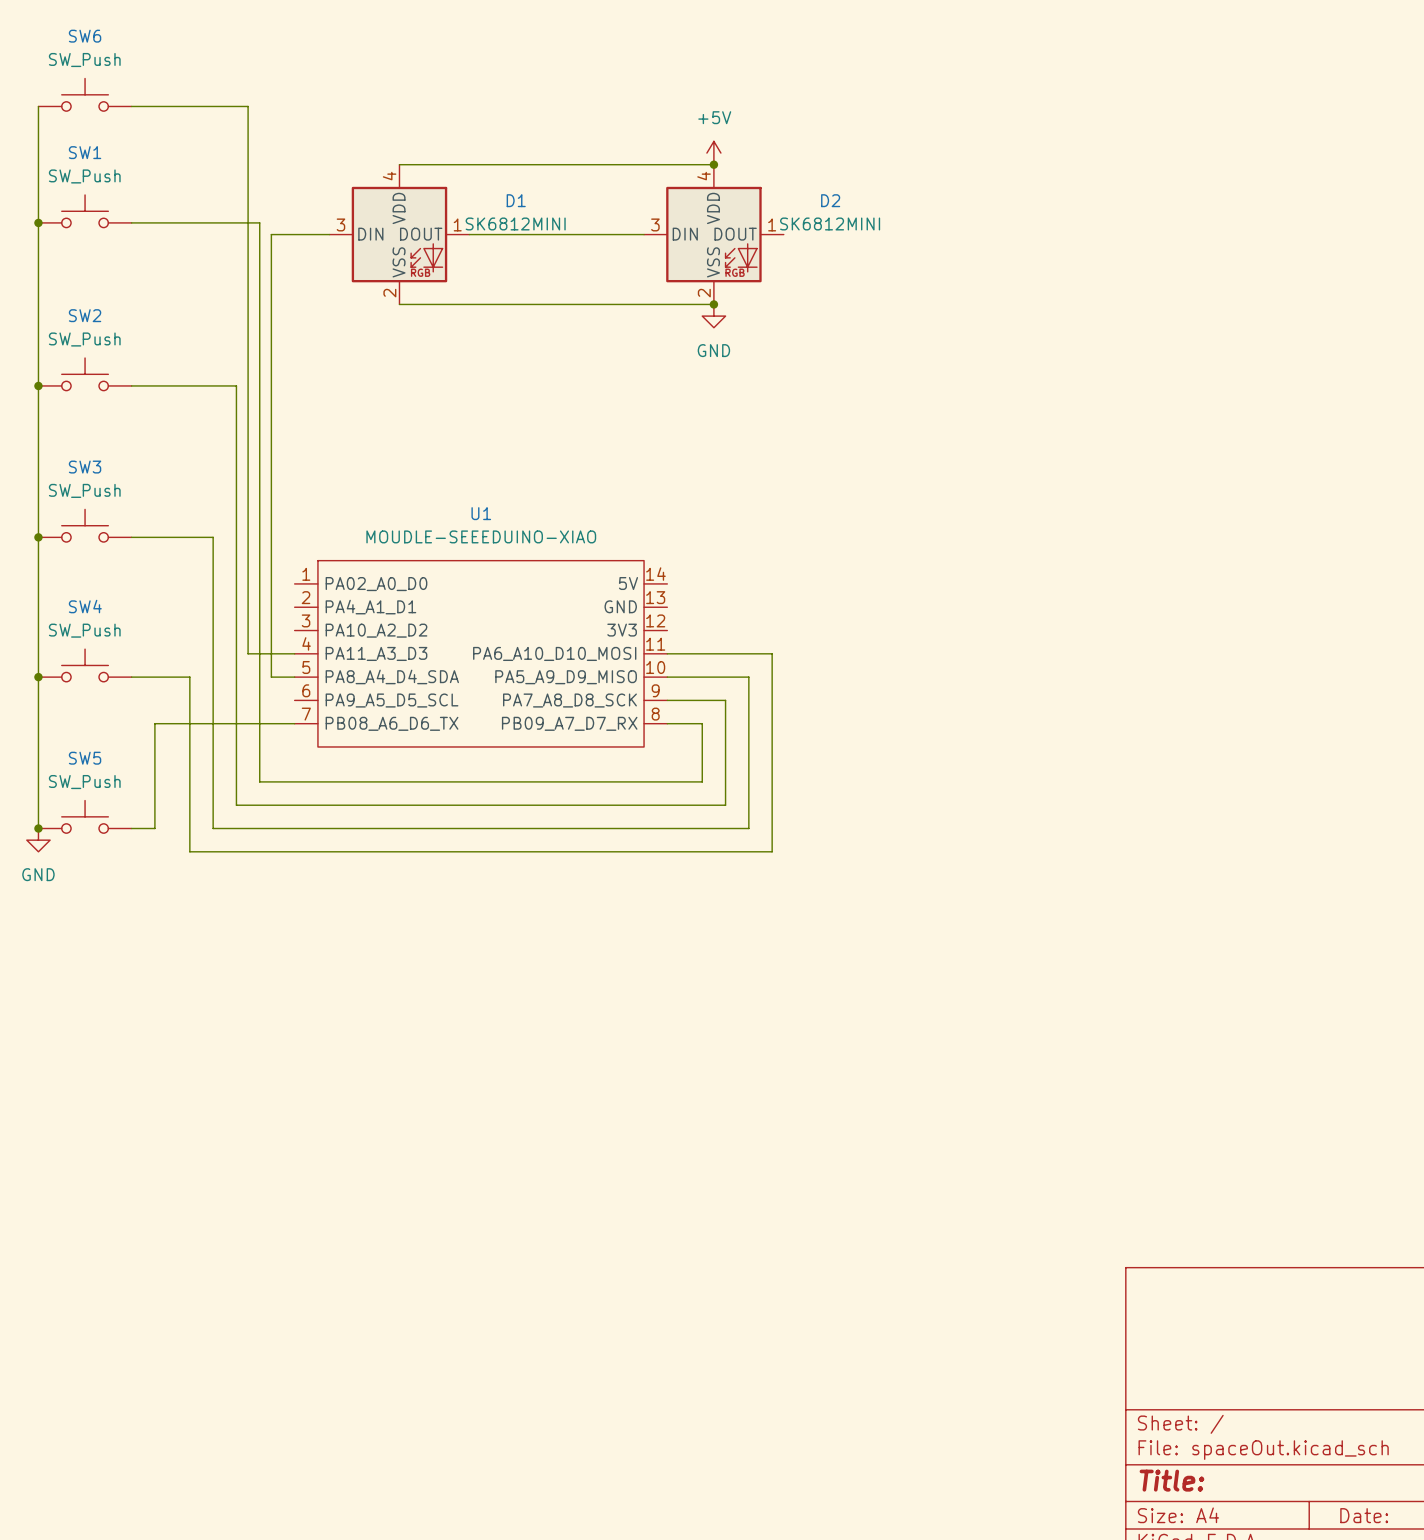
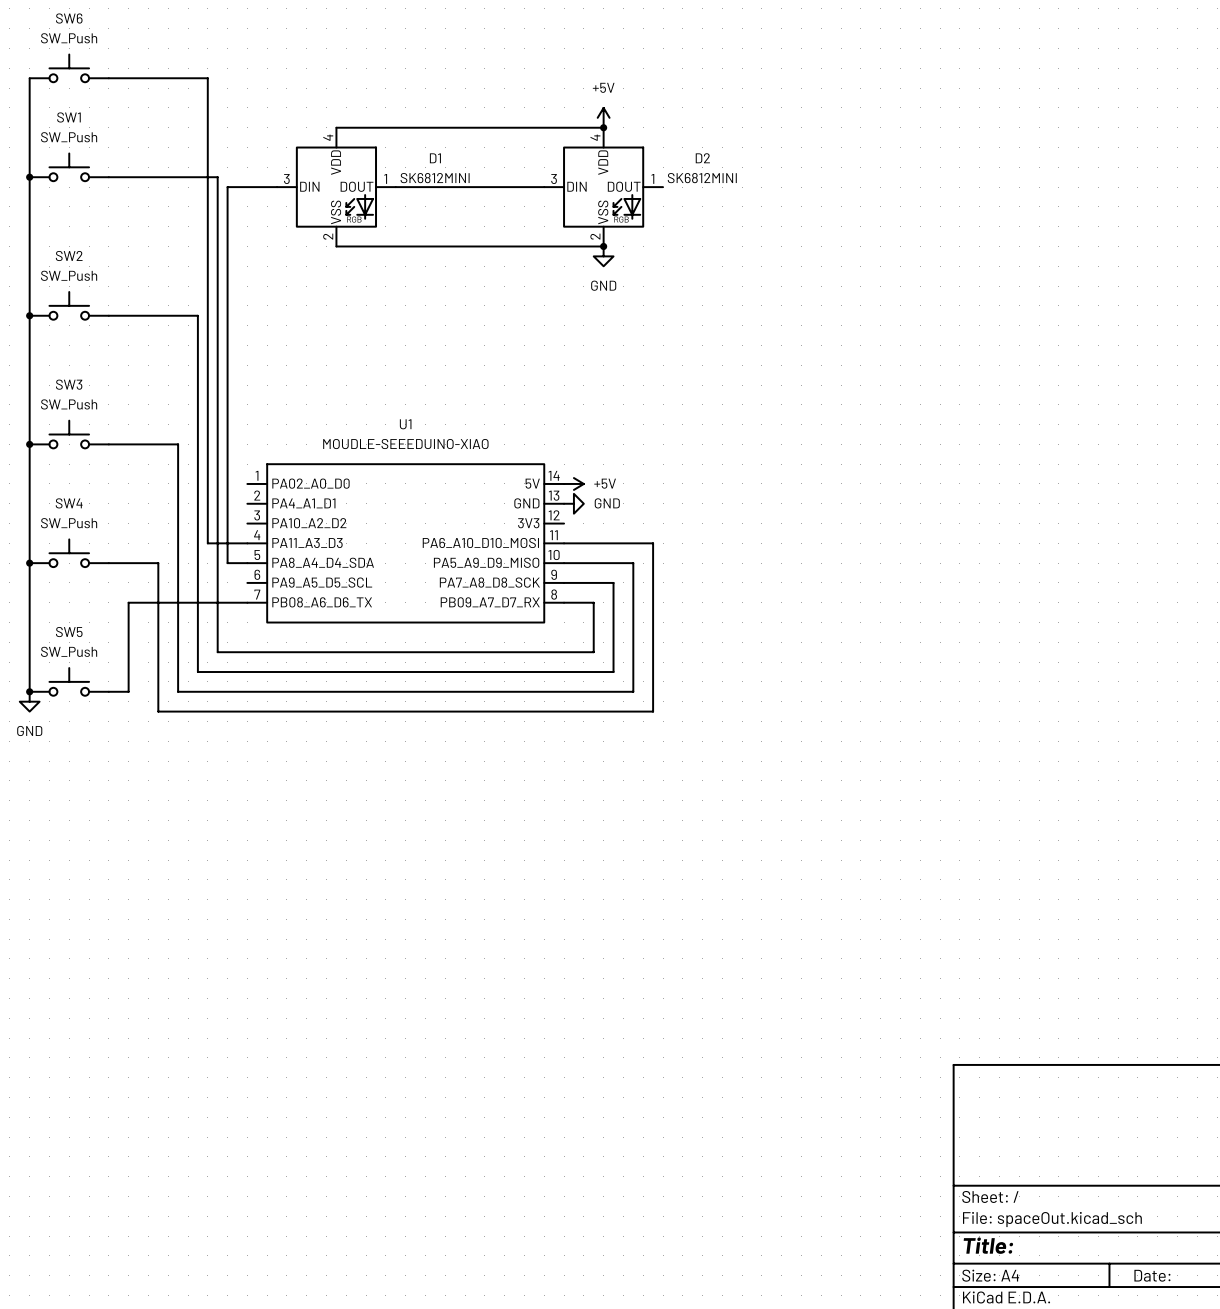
power symbol: none -> +5V (573, 483)
power symbol: none -> GND (573, 503)

